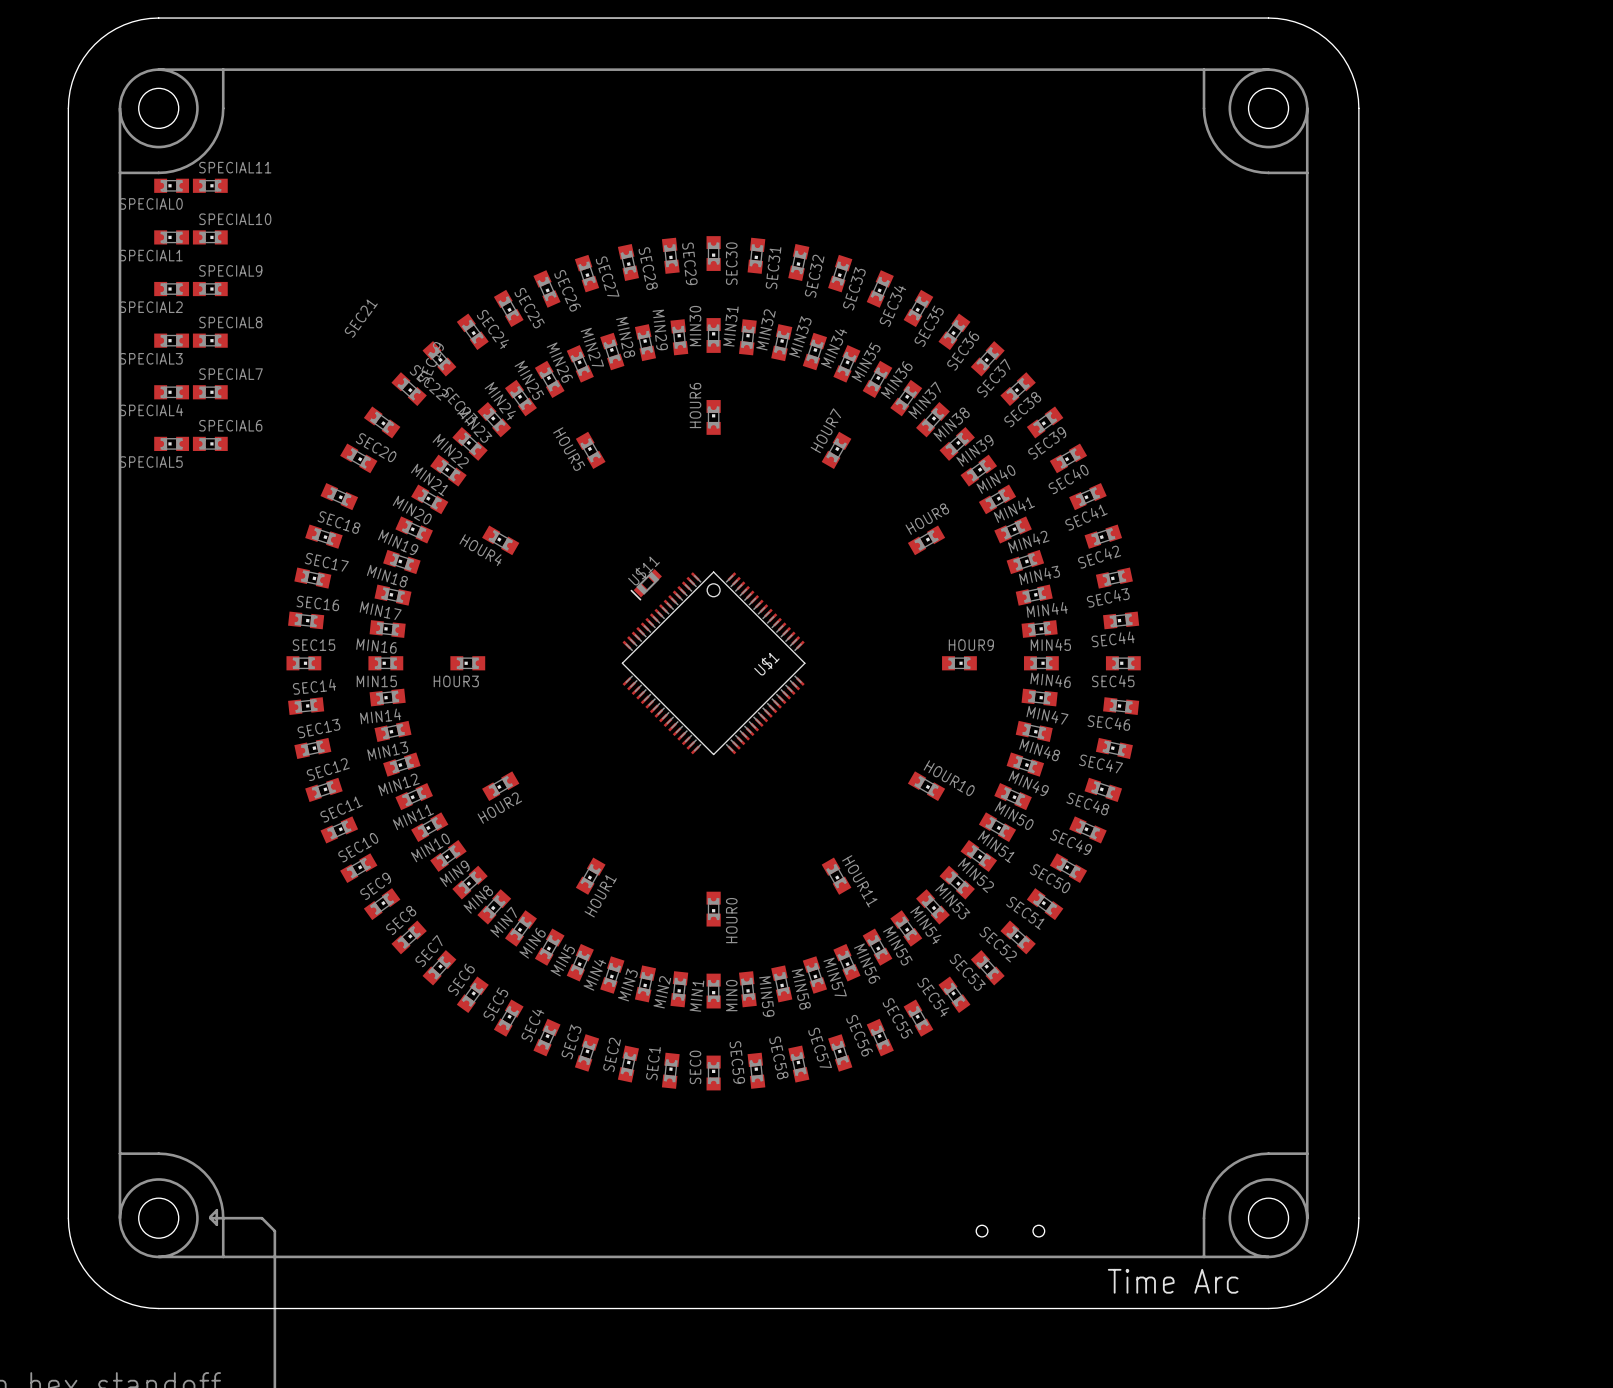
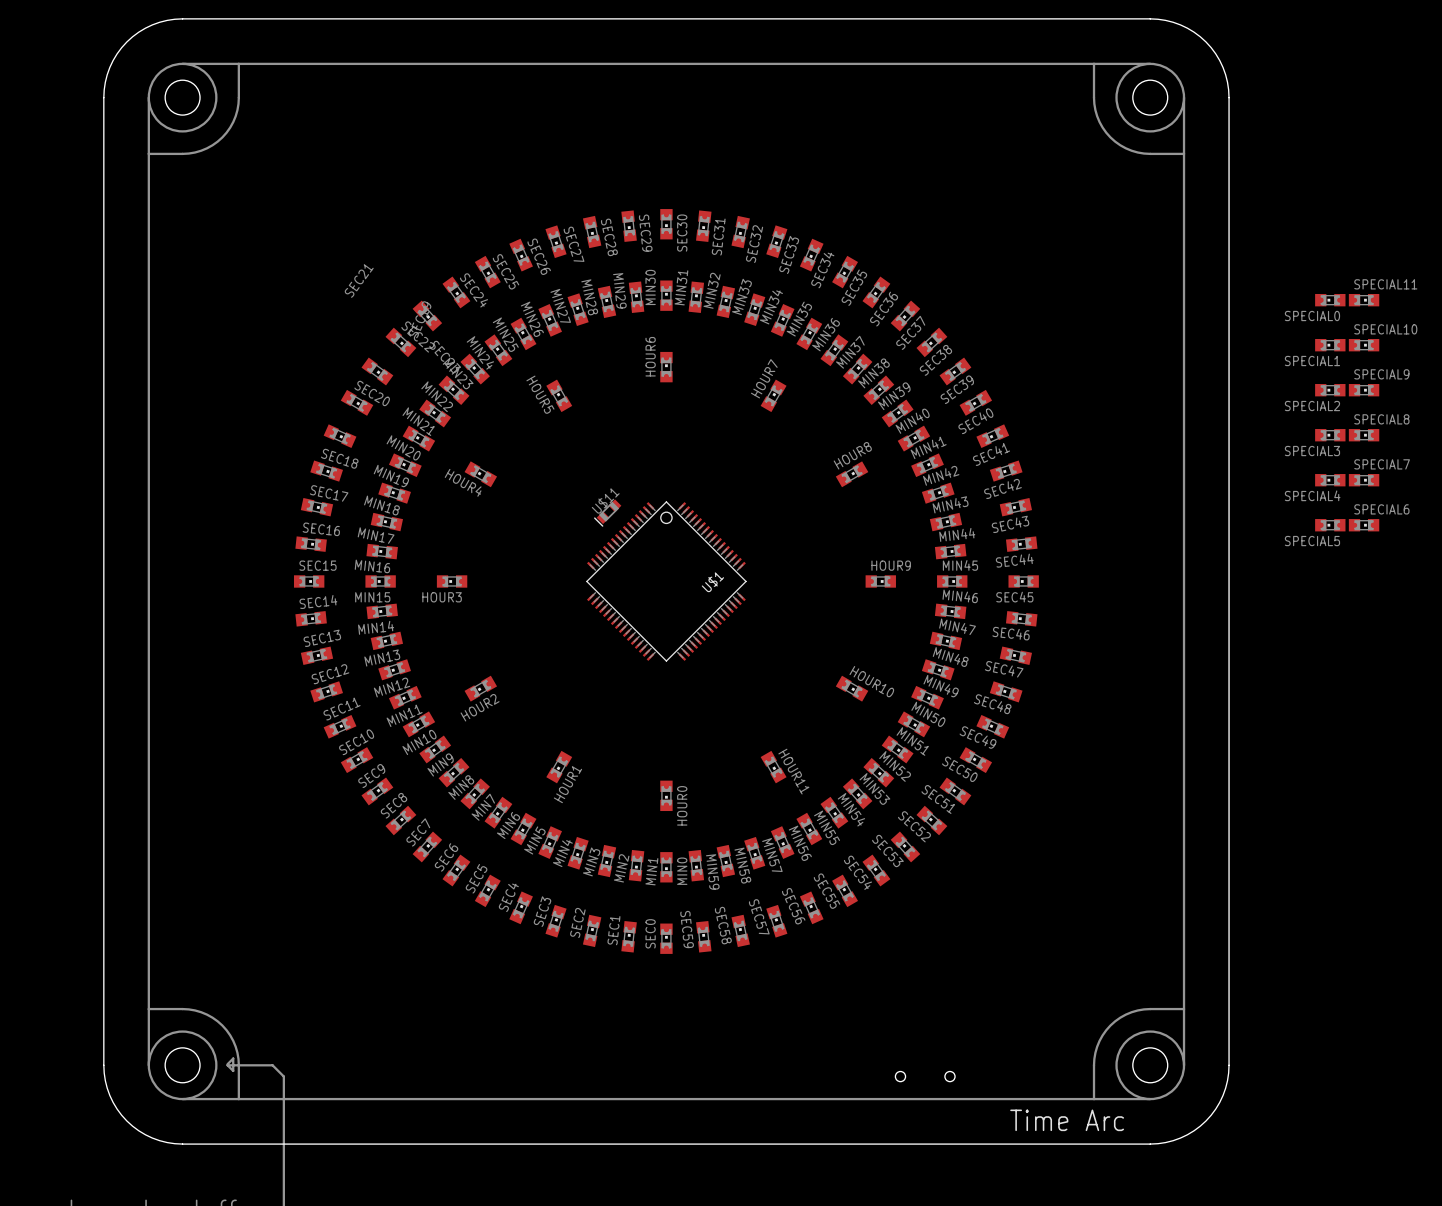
SPECIAL0 position: (171, 185) -> (1330, 300)
SPECIAL11 position: (210, 185) -> (1364, 300)
SPECIAL1 position: (171, 237) -> (1330, 345)
SPECIAL10 position: (210, 237) -> (1364, 345)
SPECIAL2 position: (171, 289) -> (1330, 390)
SPECIAL9 position: (210, 289) -> (1364, 390)
SPECIAL3 position: (171, 340) -> (1330, 435)
SPECIAL8 position: (210, 340) -> (1364, 435)
SPECIAL4 position: (171, 392) -> (1330, 480)
SPECIAL7 position: (210, 392) -> (1364, 480)
SPECIAL5 position: (171, 443) -> (1330, 525)
SPECIAL6 position: (210, 443) -> (1364, 525)

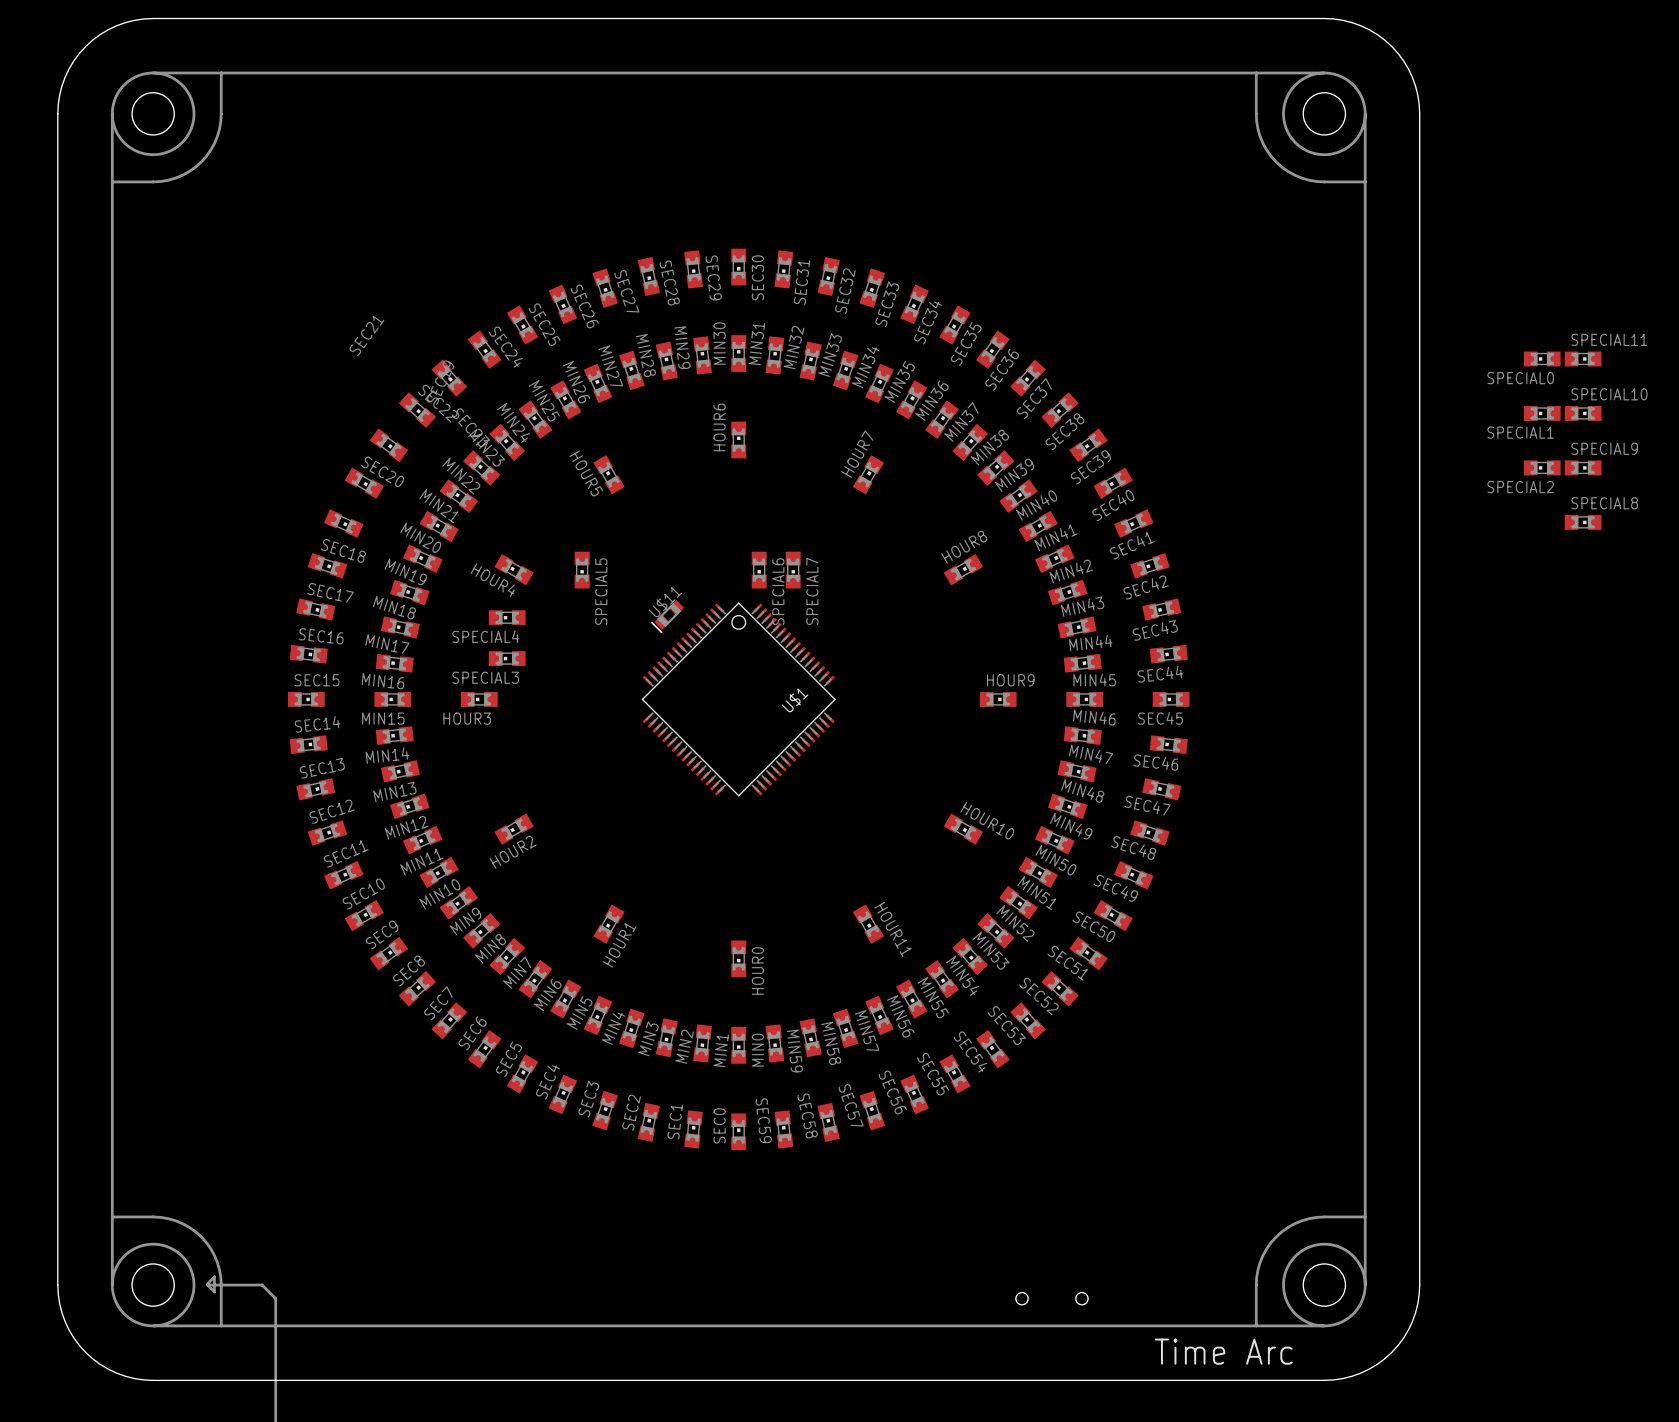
SPECIAL3 position: (1330, 435) -> (507, 658)
SPECIAL4 position: (1330, 480) -> (507, 617)
SPECIAL7 rotation: 0° (1364, 480) -> 90° clockwise (793, 570)
SPECIAL7 position: (1364, 480) -> (793, 570)
SPECIAL5 rotation: 0° (1330, 525) -> 90° counterclockwise (582, 570)
SPECIAL5 position: (1330, 525) -> (582, 570)
SPECIAL6 rotation: 0° (1364, 525) -> 90° clockwise (759, 570)
SPECIAL6 position: (1364, 525) -> (759, 570)

